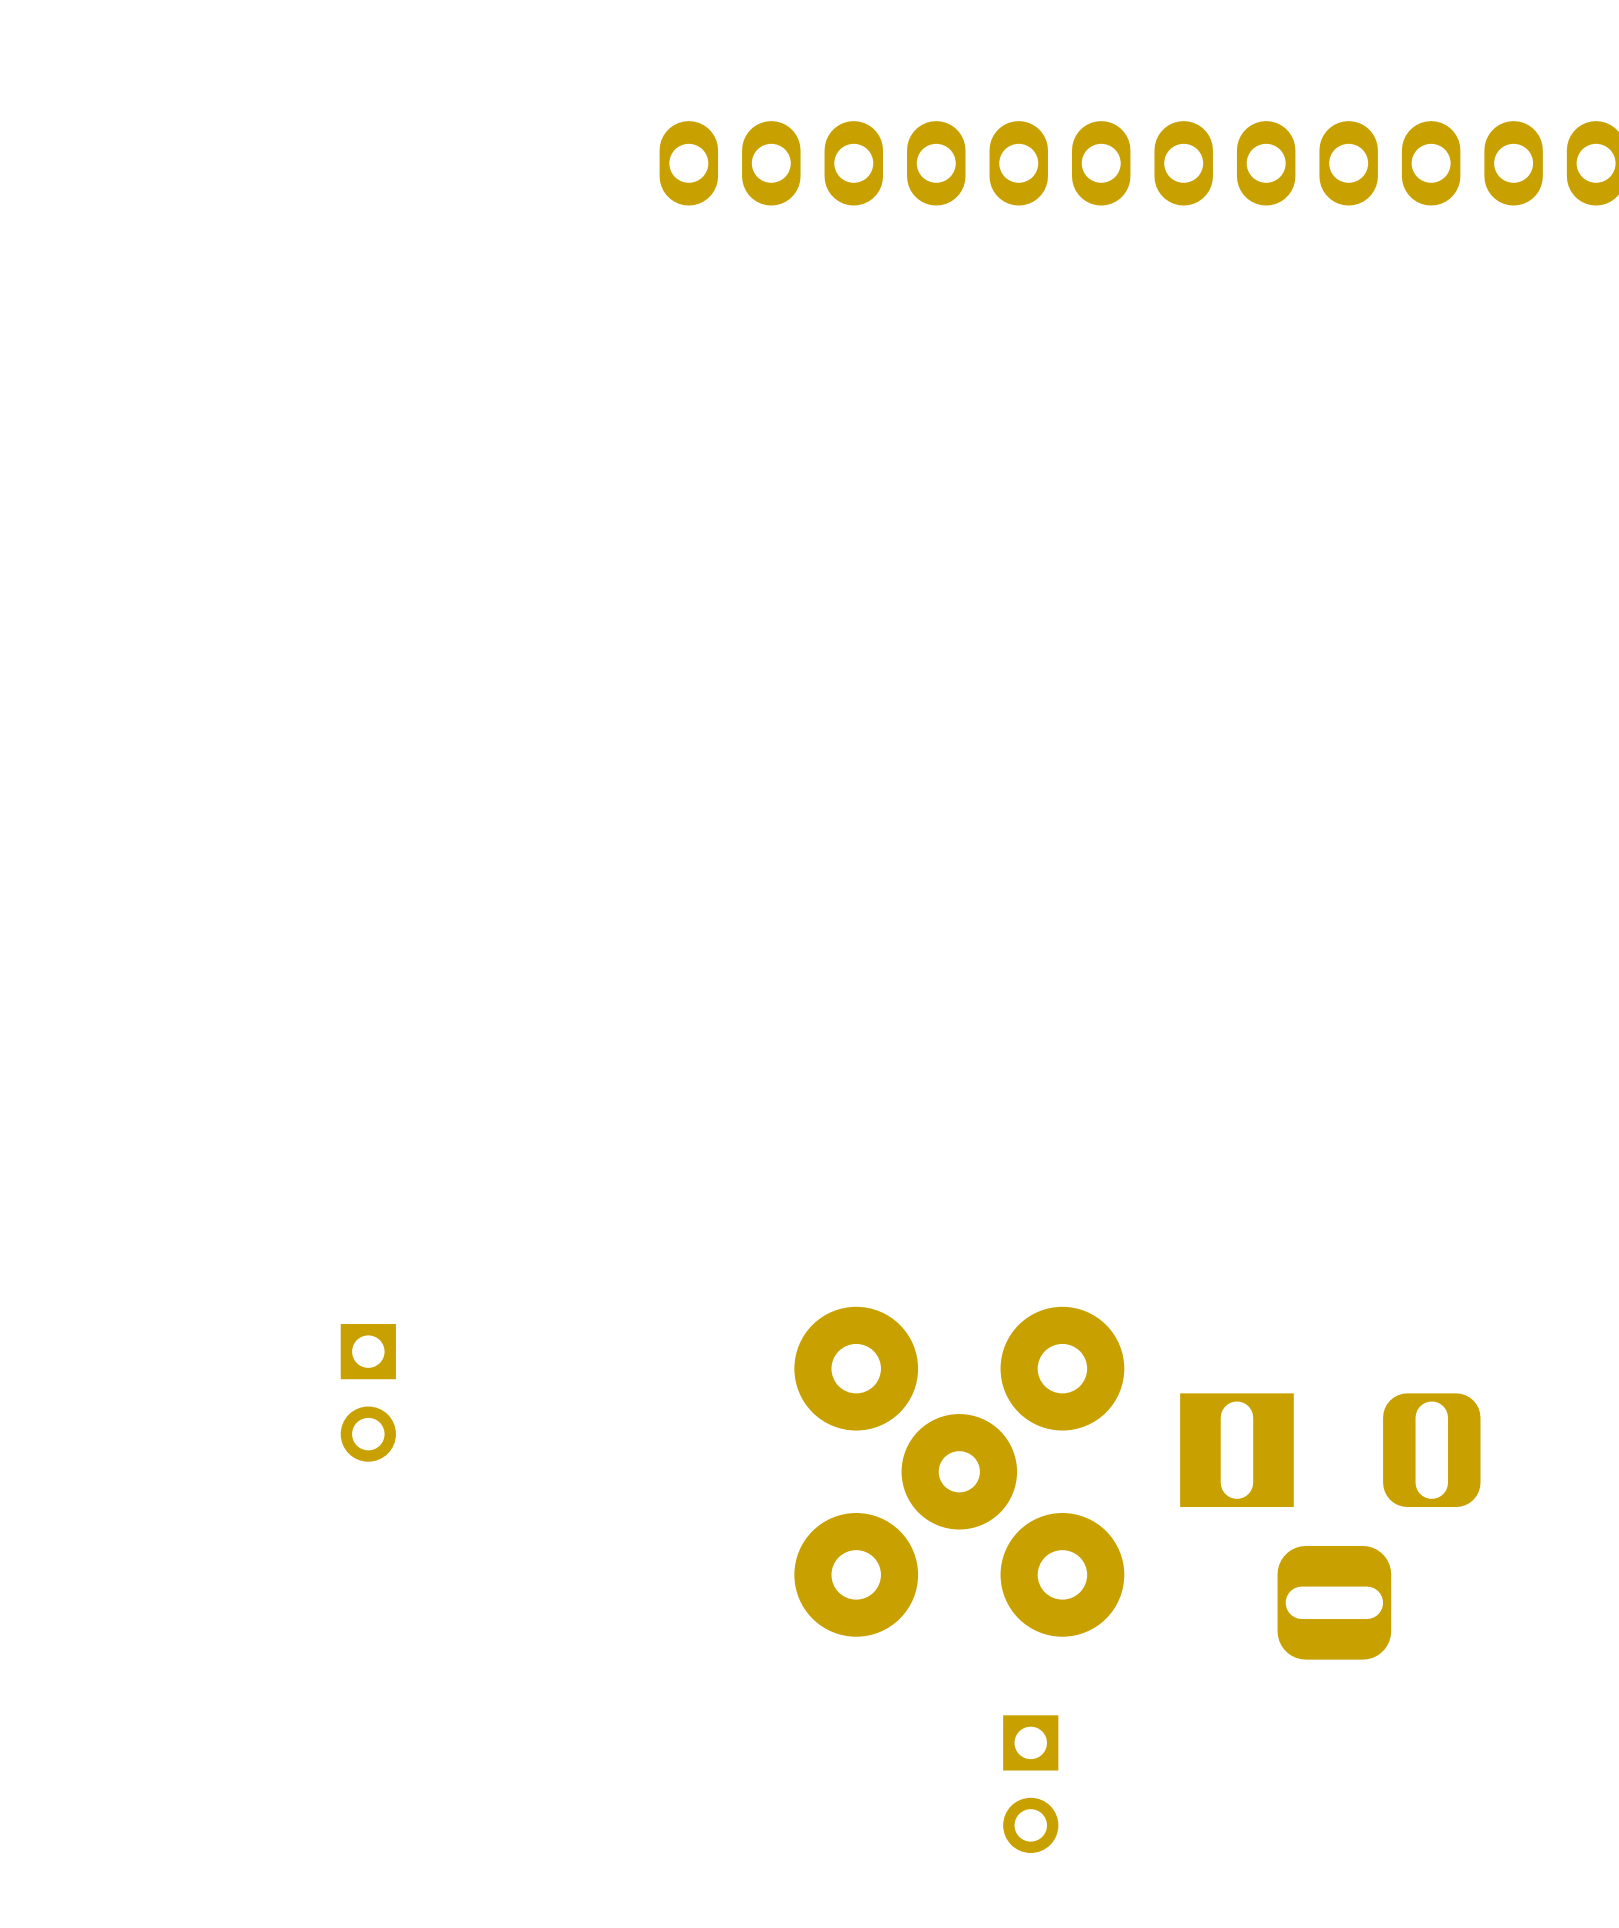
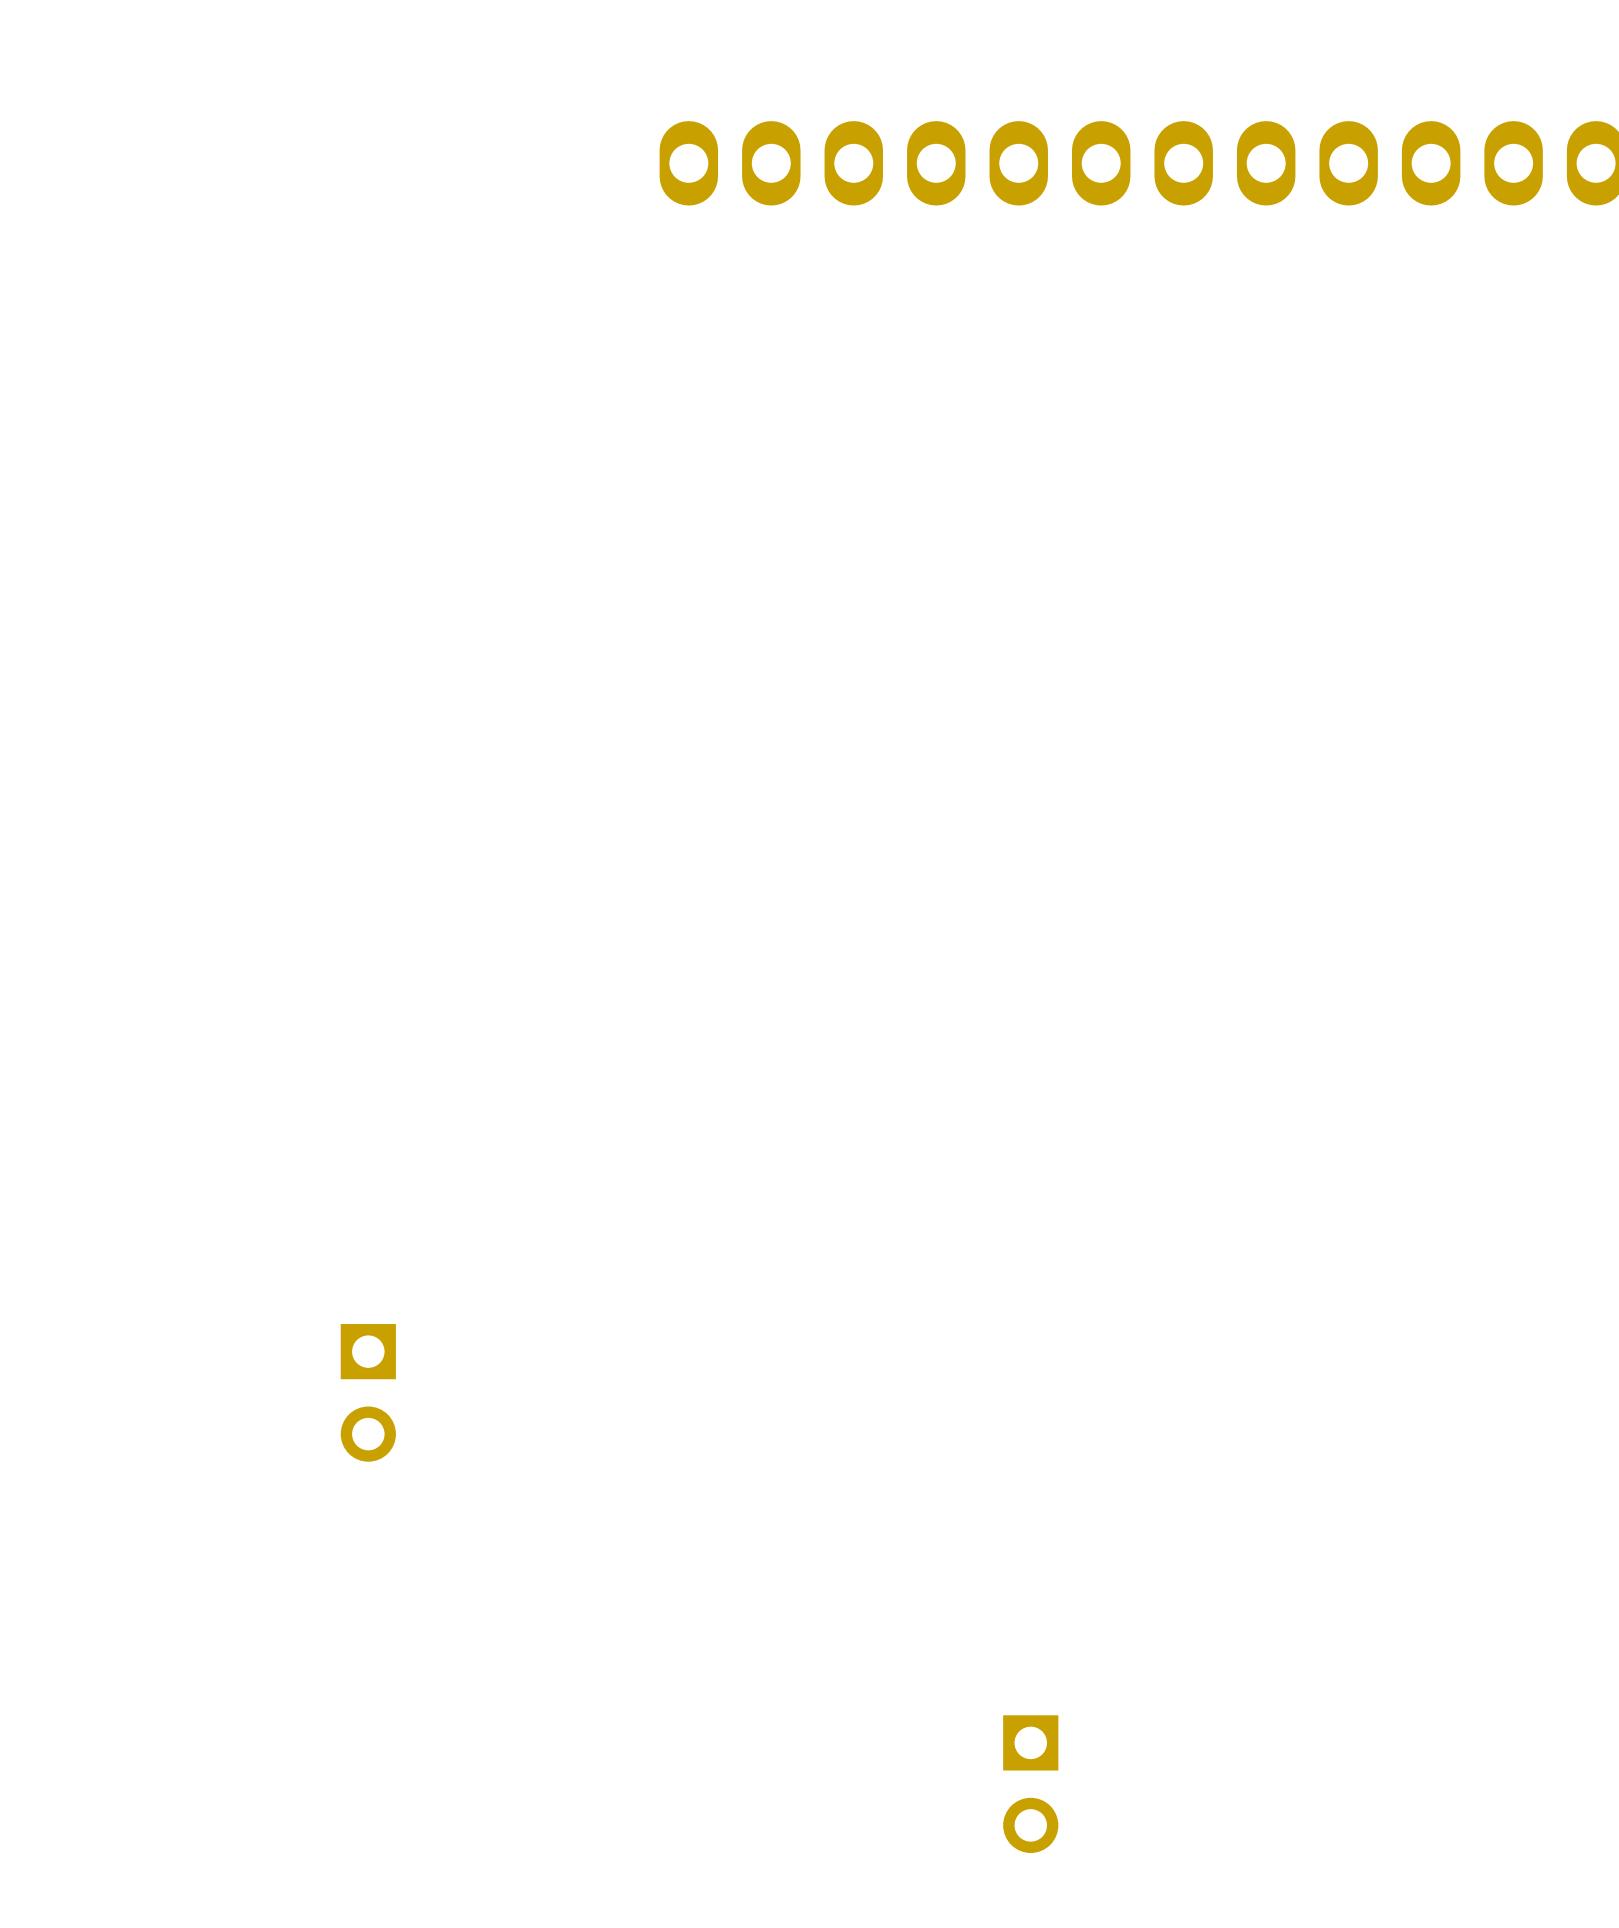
part: (959, 1471) -> none
part: (1330, 1526) -> none

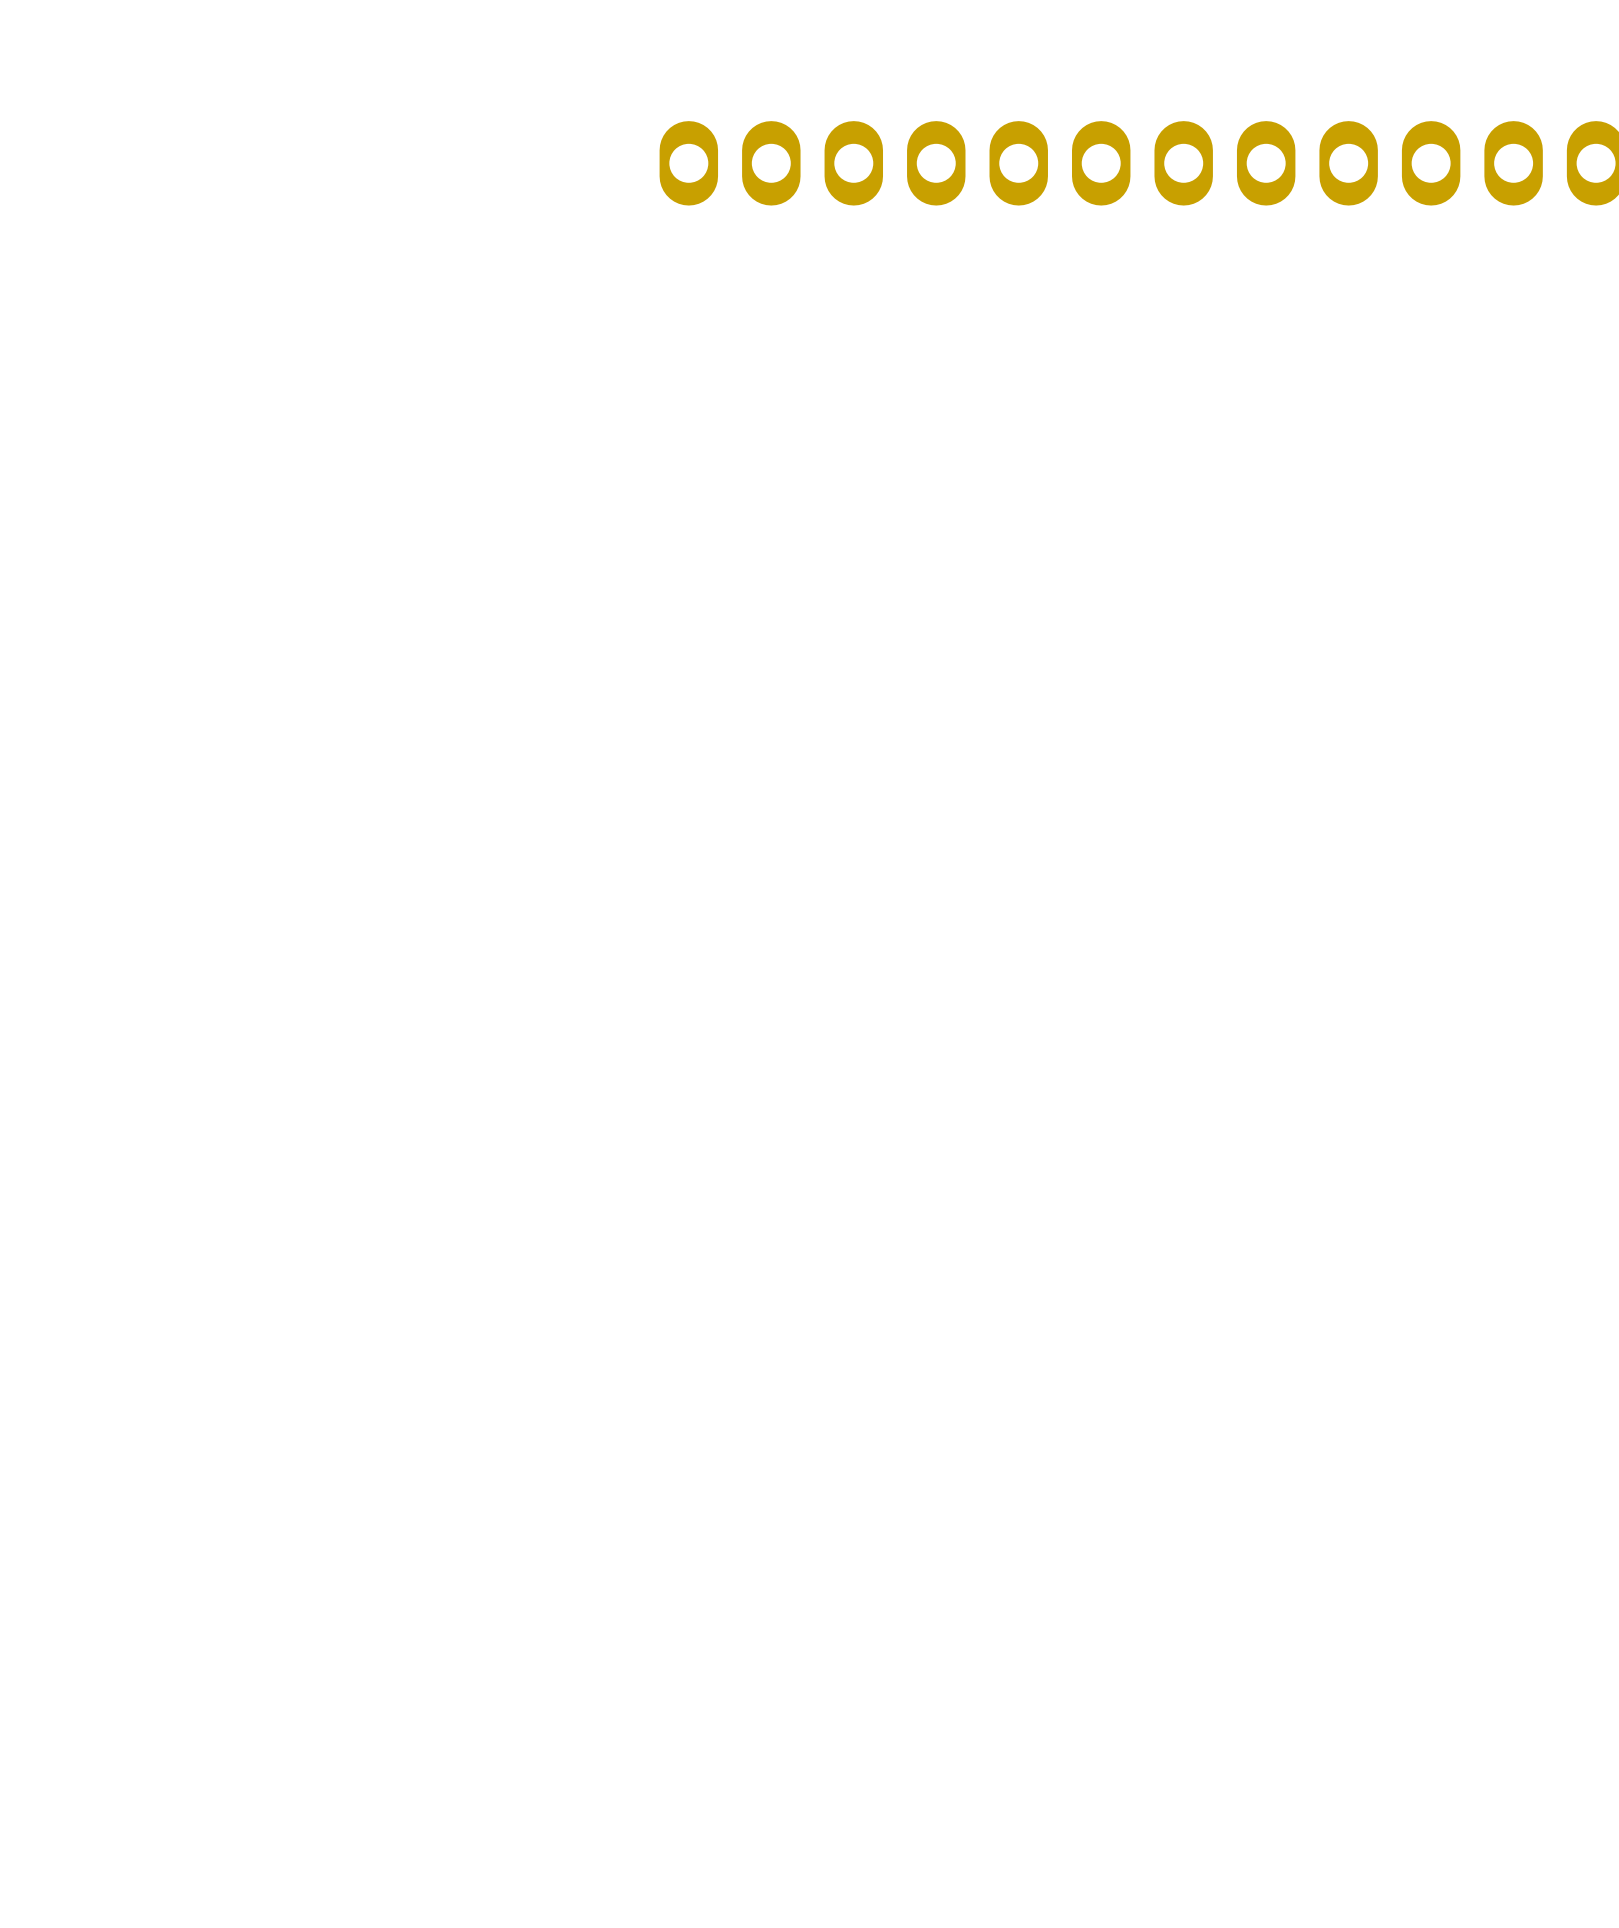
part: (368, 1392) -> none
part: (1030, 1784) -> none

